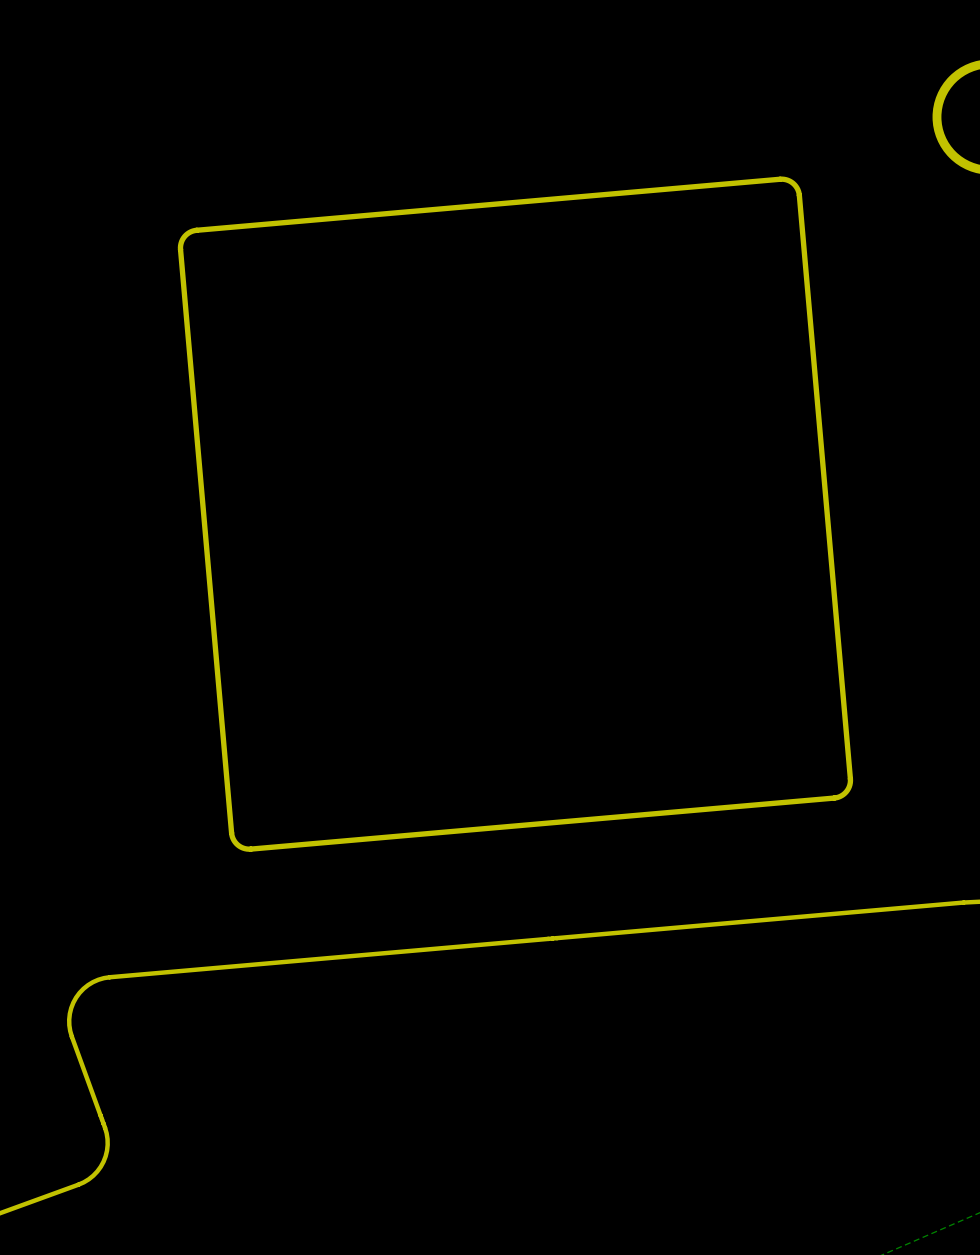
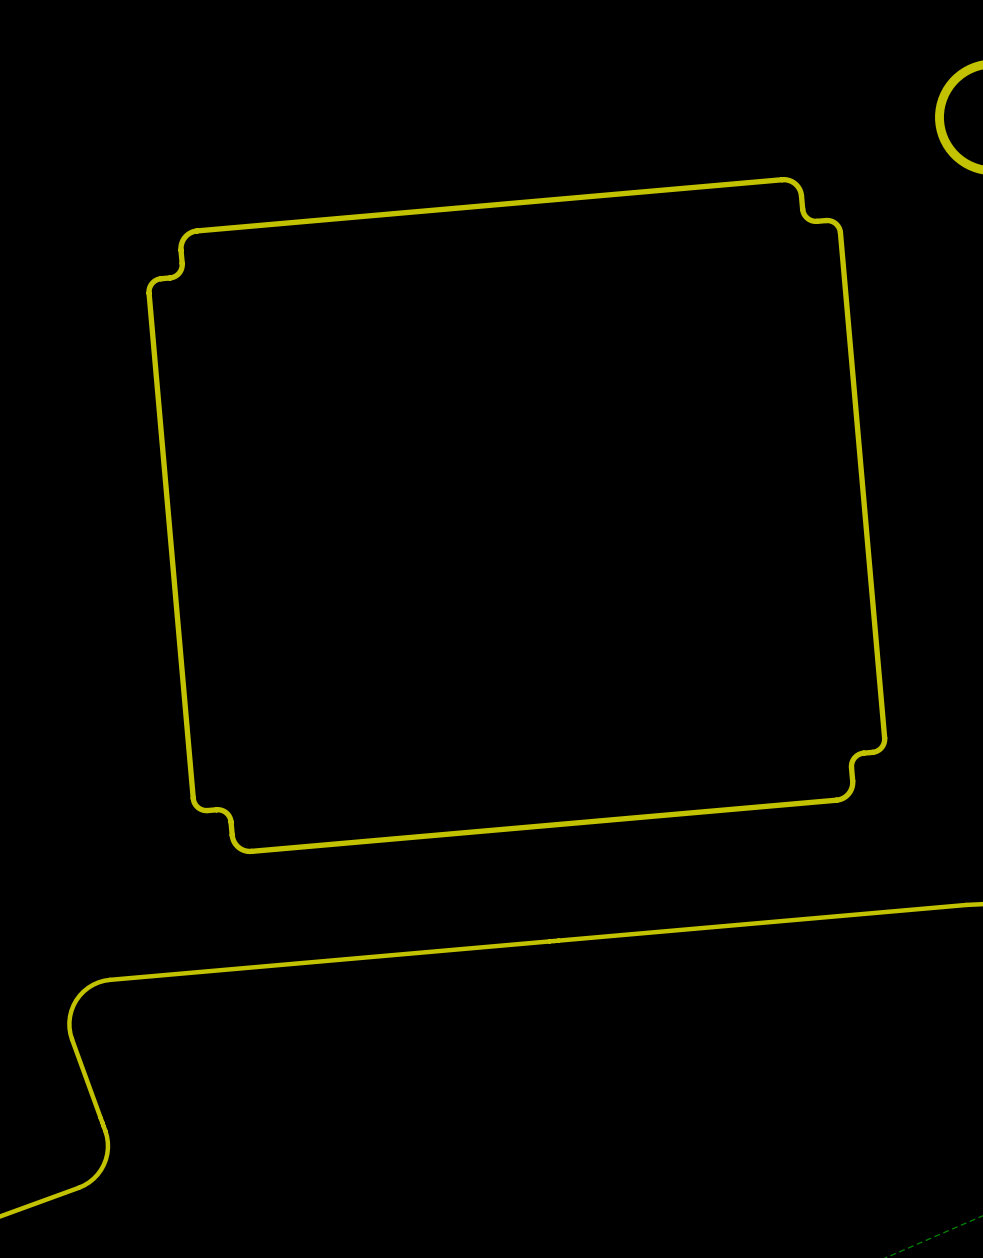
drawing shape: [177, 176, 854, 852] -> [146, 176, 888, 855]

